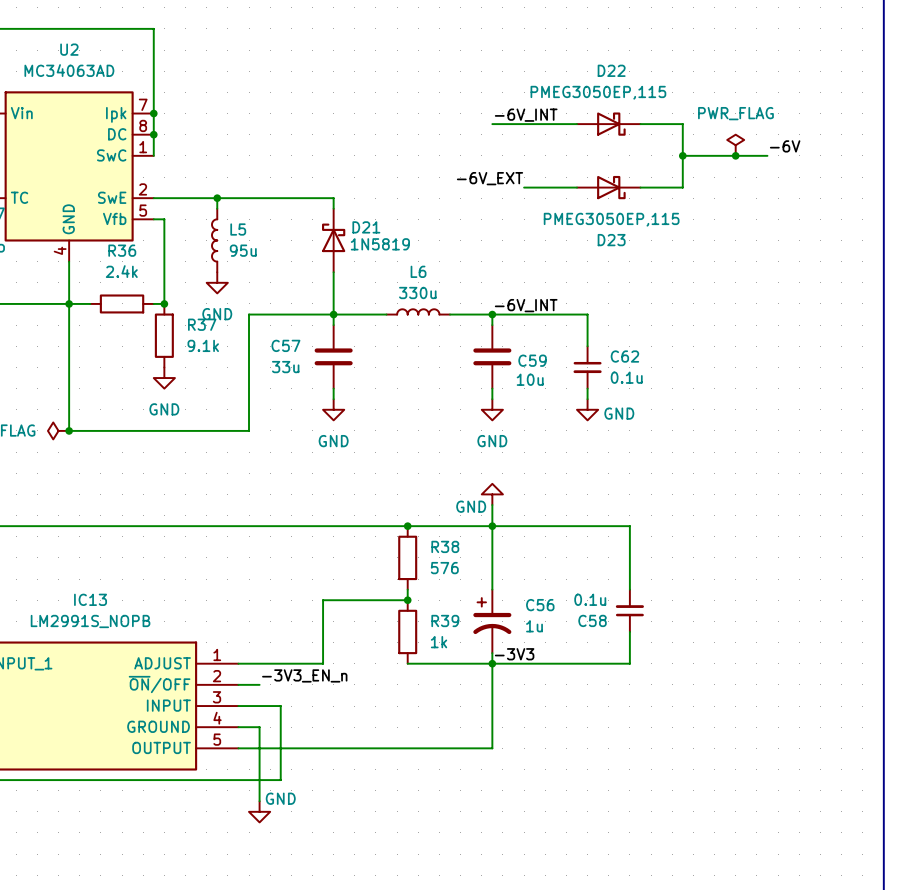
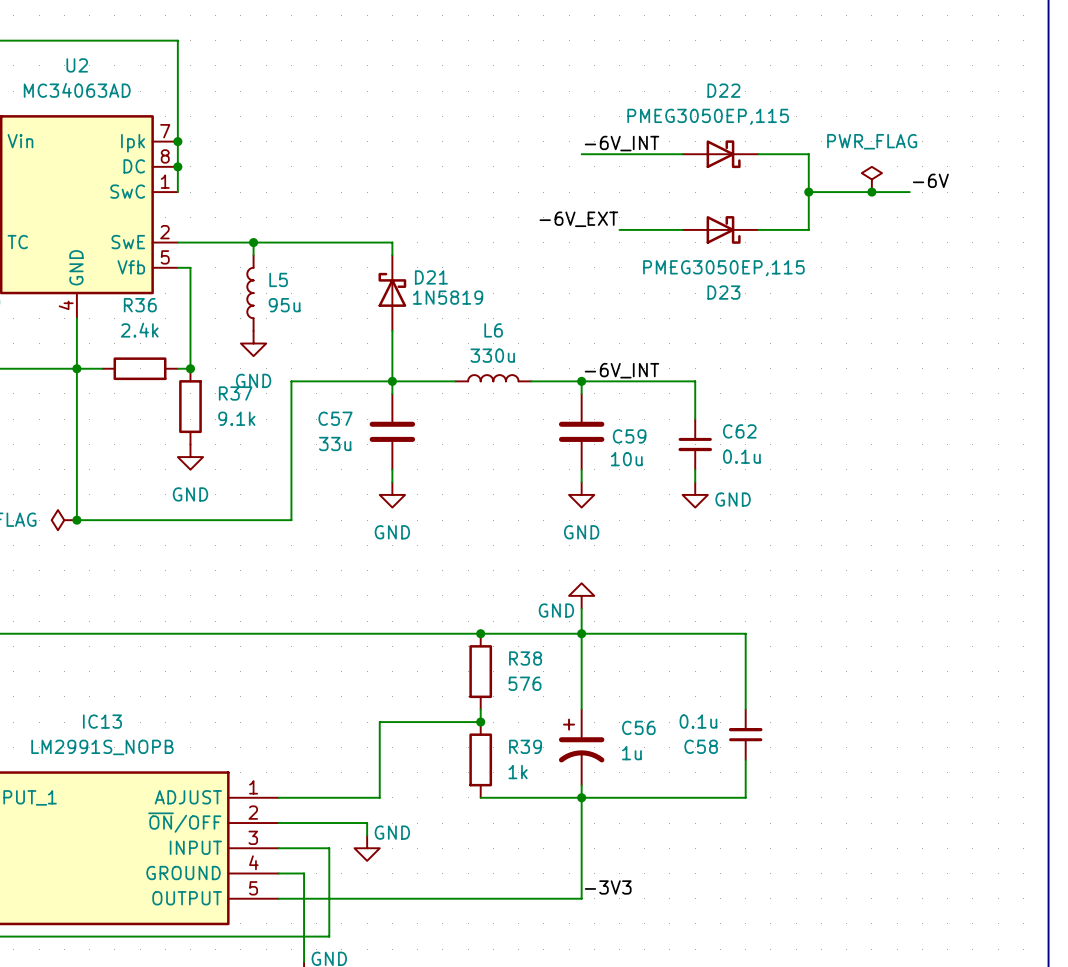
label position: -3V3 (514, 654) -> -3V3 (608, 887)
label: -3V3_EN_n (304, 675) -> none
wire: none -> (304, 823) (367, 823) (367, 835)
power symbol: none -> GND (367, 848)

